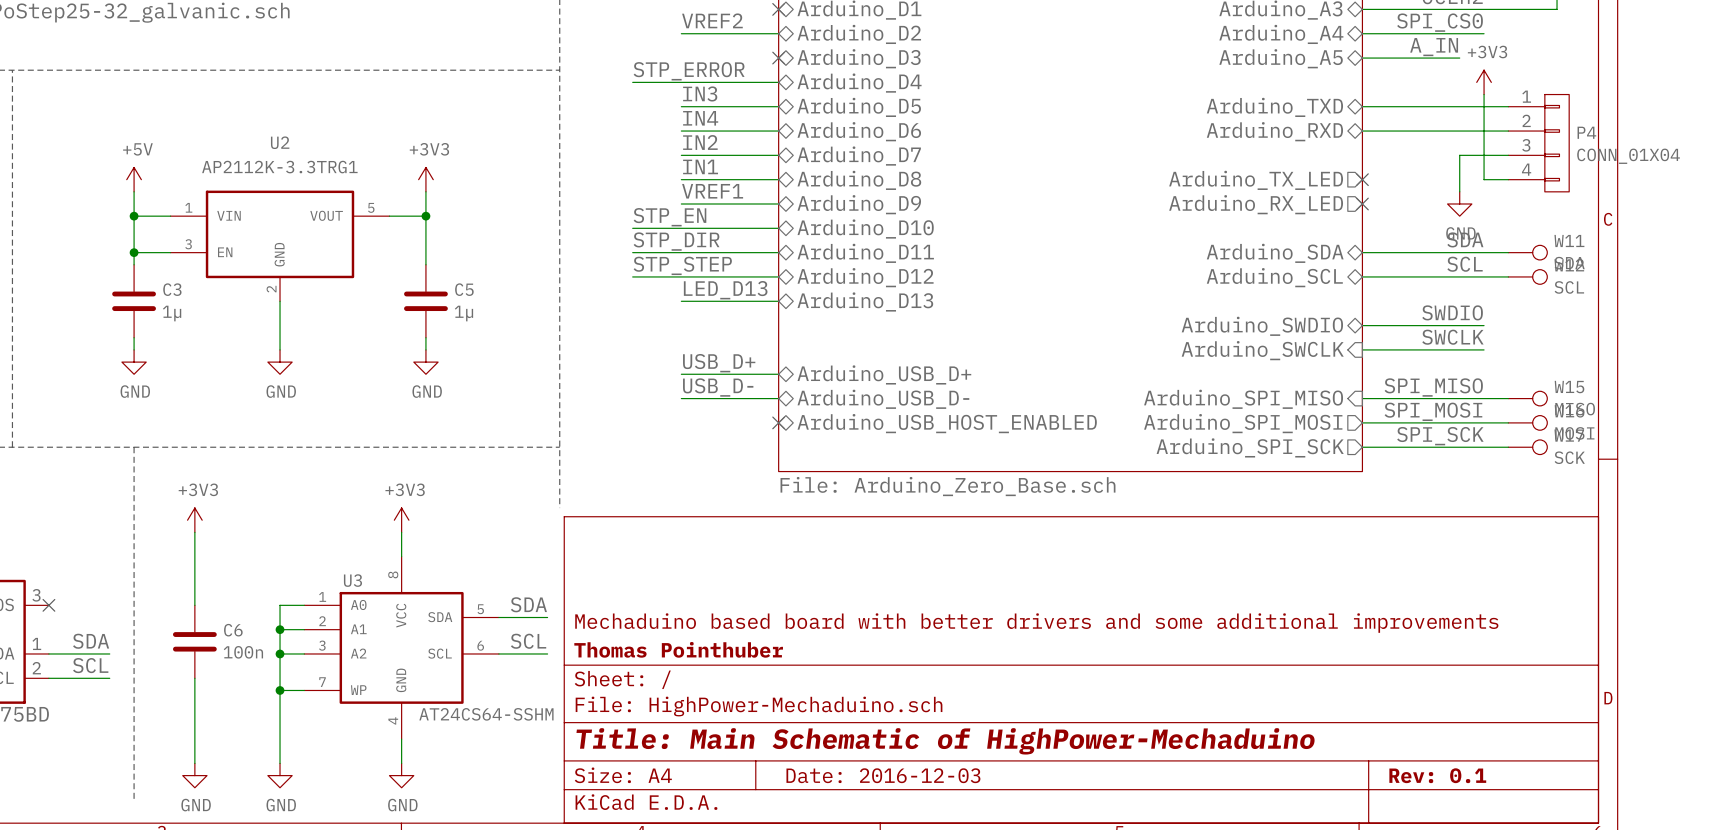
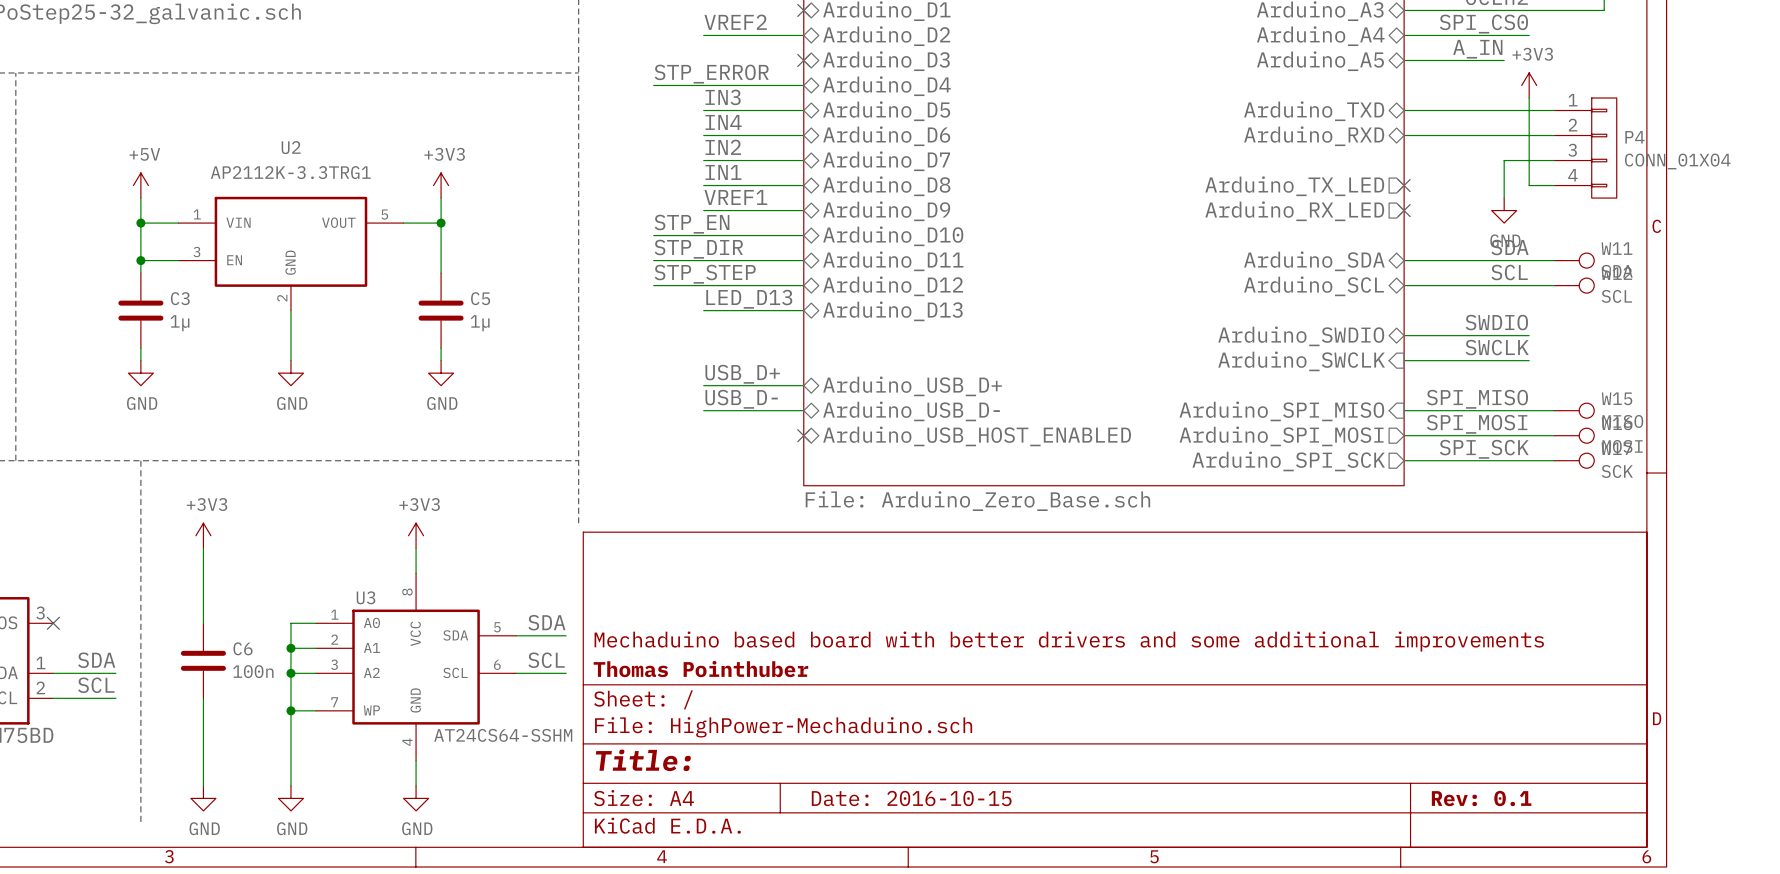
title block: Title: Main Schematic of HighPower-Mechaduino (945, 741) -> Title: (643, 760)
title block: Date: 2016-12-03 (883, 775) -> Date: 2016-10-15 (911, 798)

